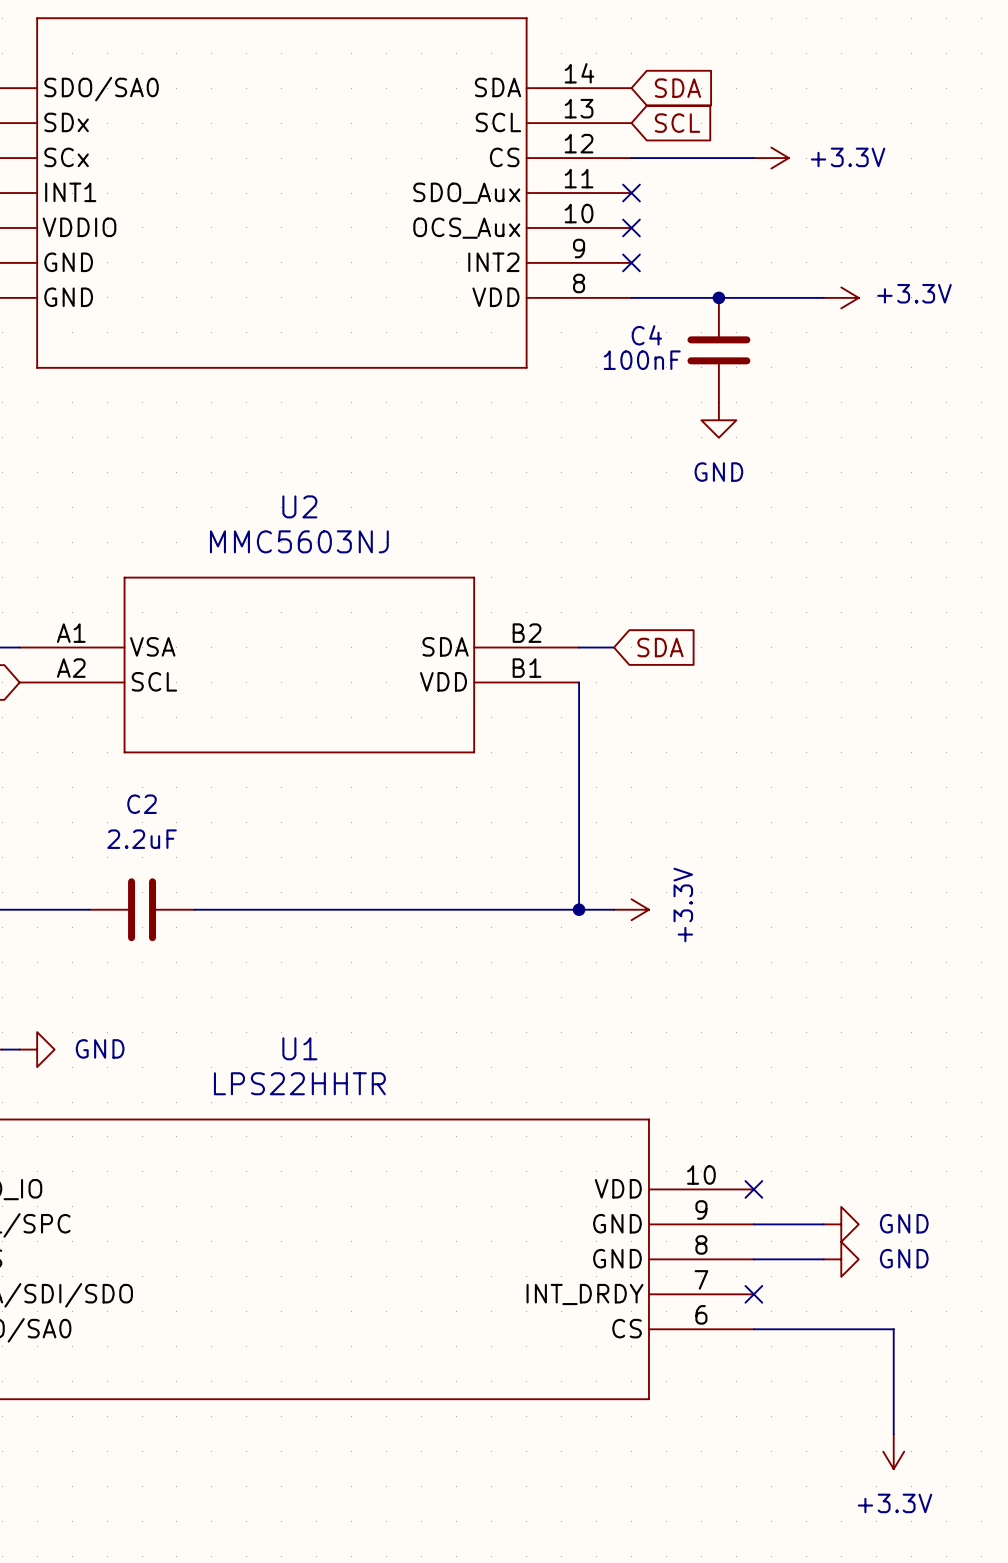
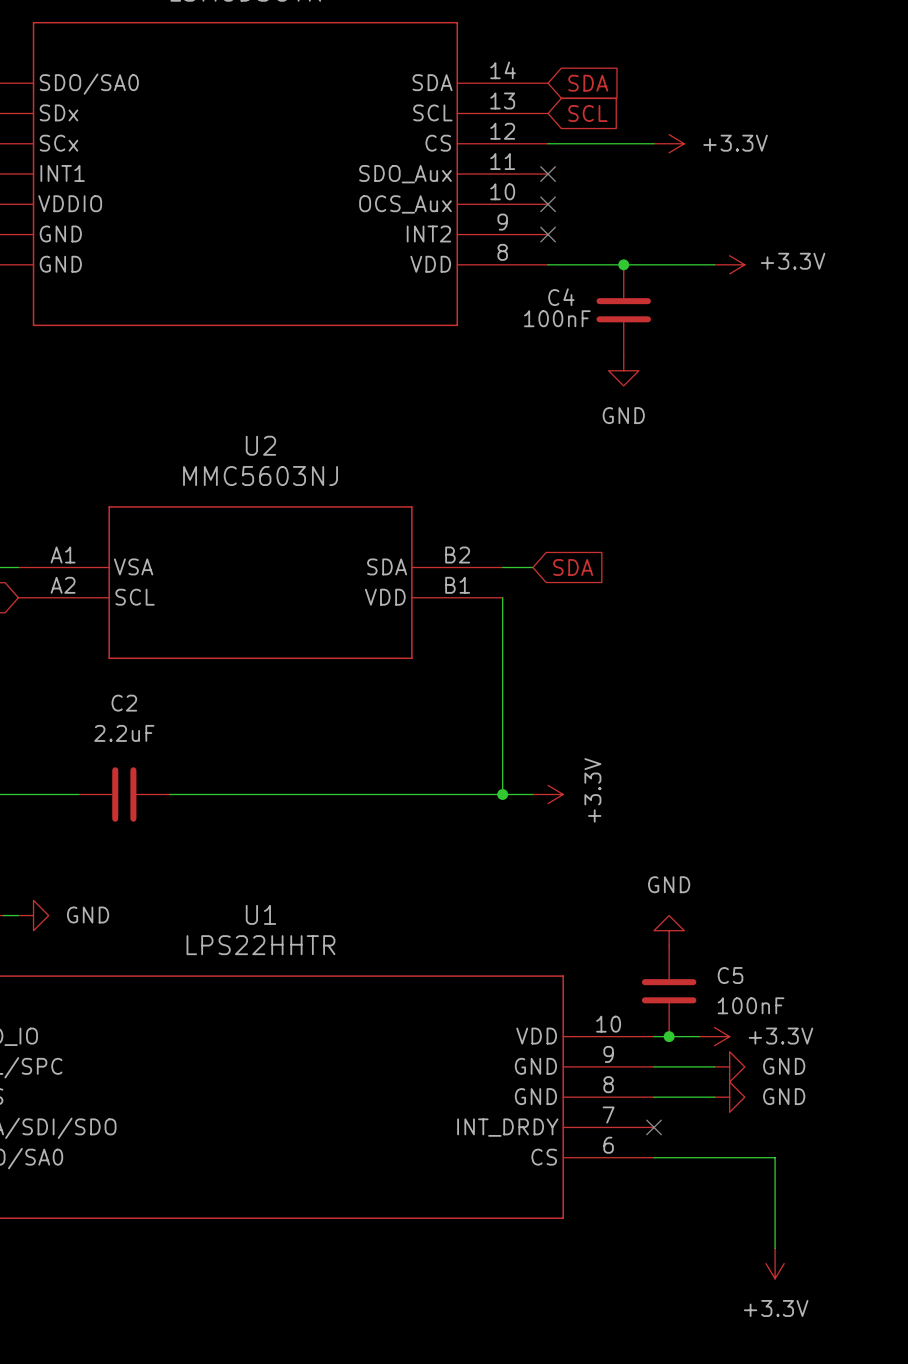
power symbol: none -> GND (669, 930)
C5: none -> 100nF (669, 991)
wire: none -> (654, 1036) (699, 1036)
no-connect mark: (753, 1189) -> none
junction: none -> (669, 1036)
power symbol: none -> +3.3V (714, 1036)

